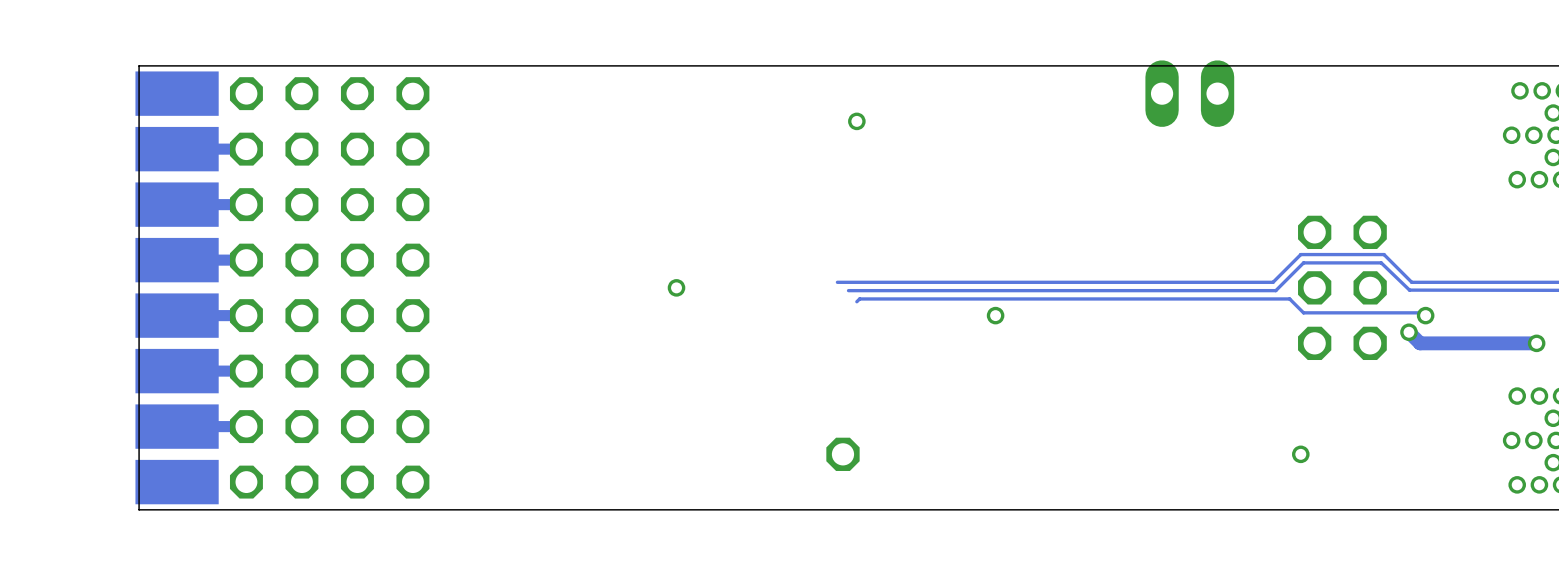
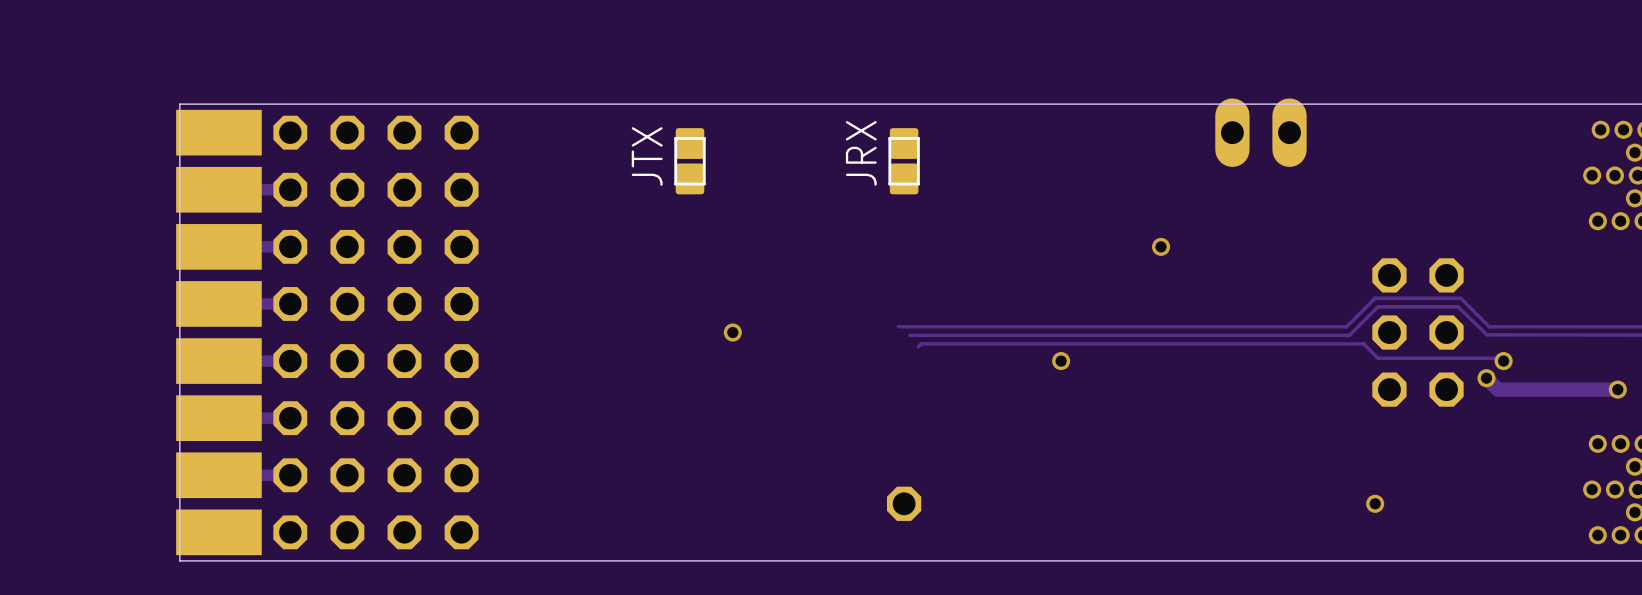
JTX: none -> (690, 161)
JRX: none -> (904, 161)
via: (856, 121) -> none
via: none -> (1161, 246)

